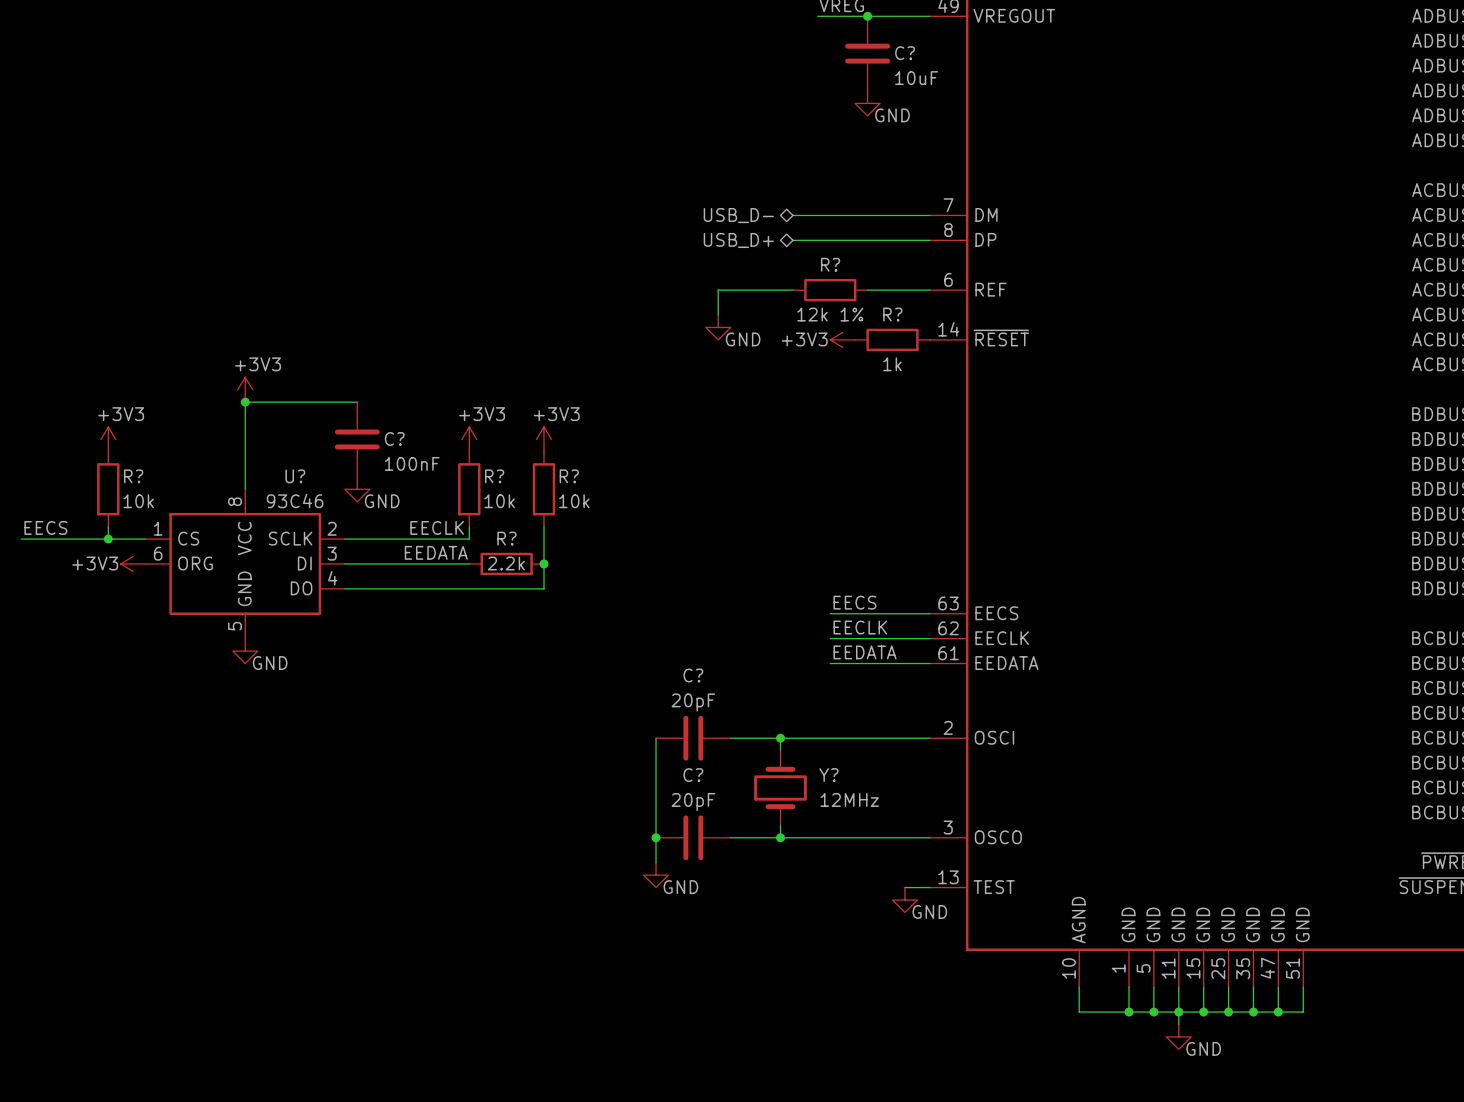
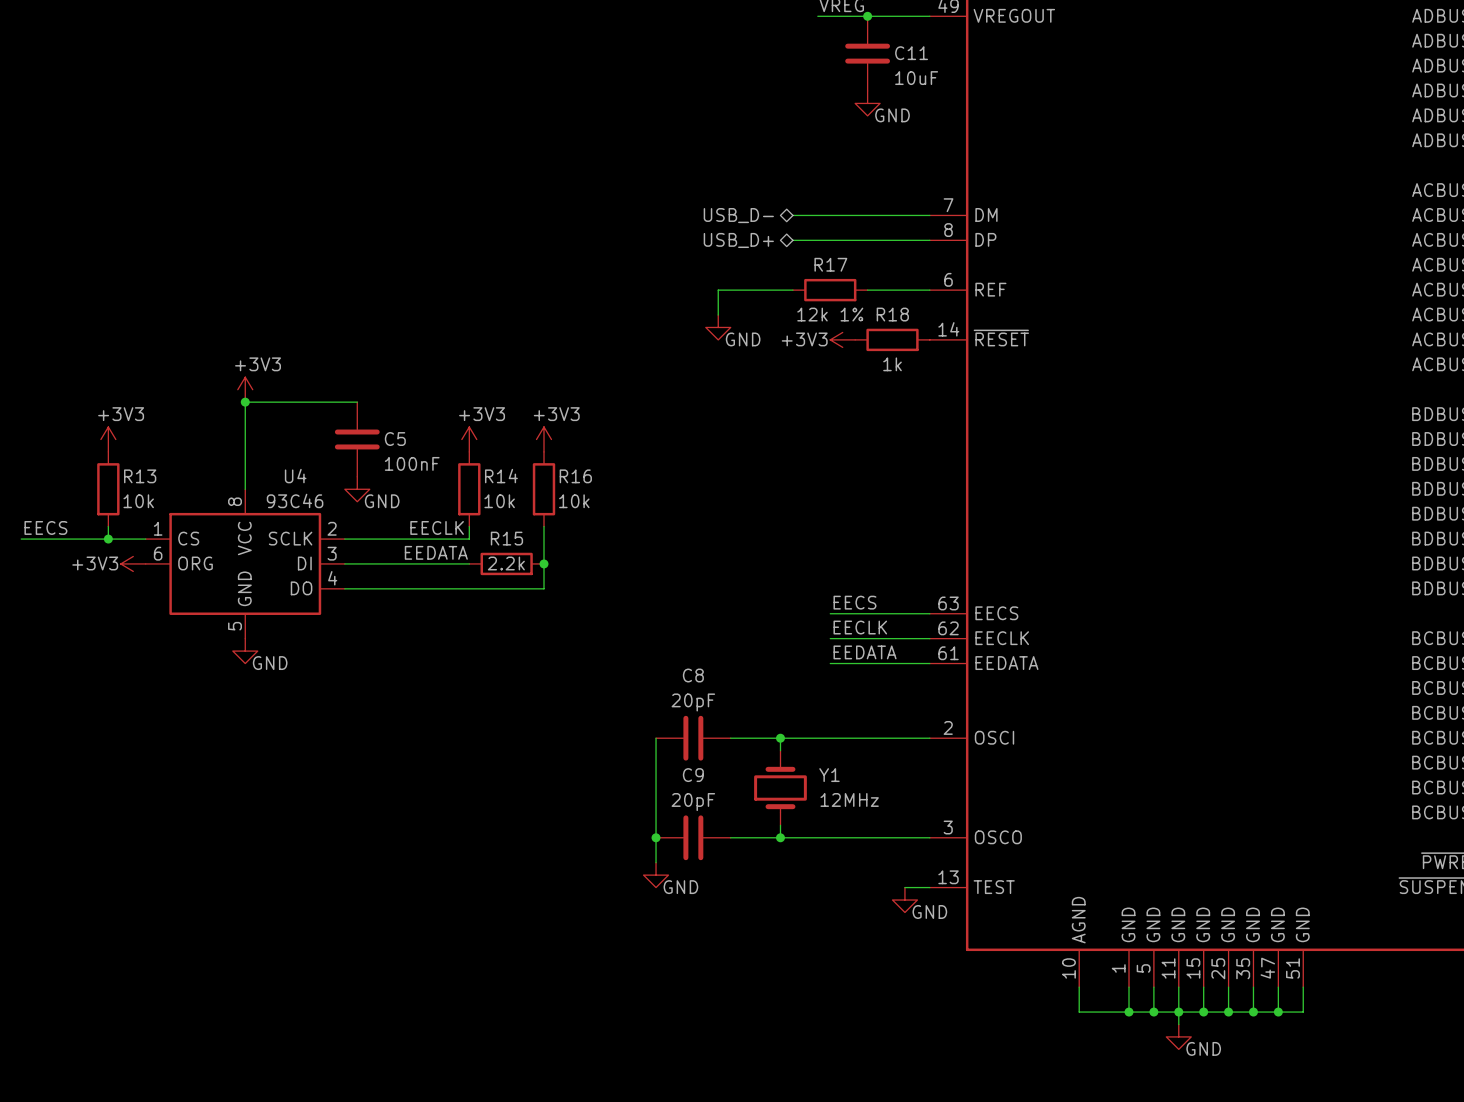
C? name: C? (905, 53) -> C11 (911, 53)
R? name: R? (830, 264) -> R17 (830, 264)
R? name: R? (892, 314) -> R18 (892, 314)
C? name: C? (394, 439) -> C5 (395, 439)
R? name: R? (133, 476) -> R13 (140, 476)
U? name: U? (295, 476) -> U4 (295, 476)
R? name: R? (494, 476) -> R14 (501, 476)
R? name: R? (569, 476) -> R16 (575, 476)
R? name: R? (506, 538) -> R15 (506, 538)
C? name: C? (693, 675) -> C8 (693, 675)
C? name: C? (693, 775) -> C9 (693, 775)
Y? name: Y? (828, 775) -> Y1 (829, 775)

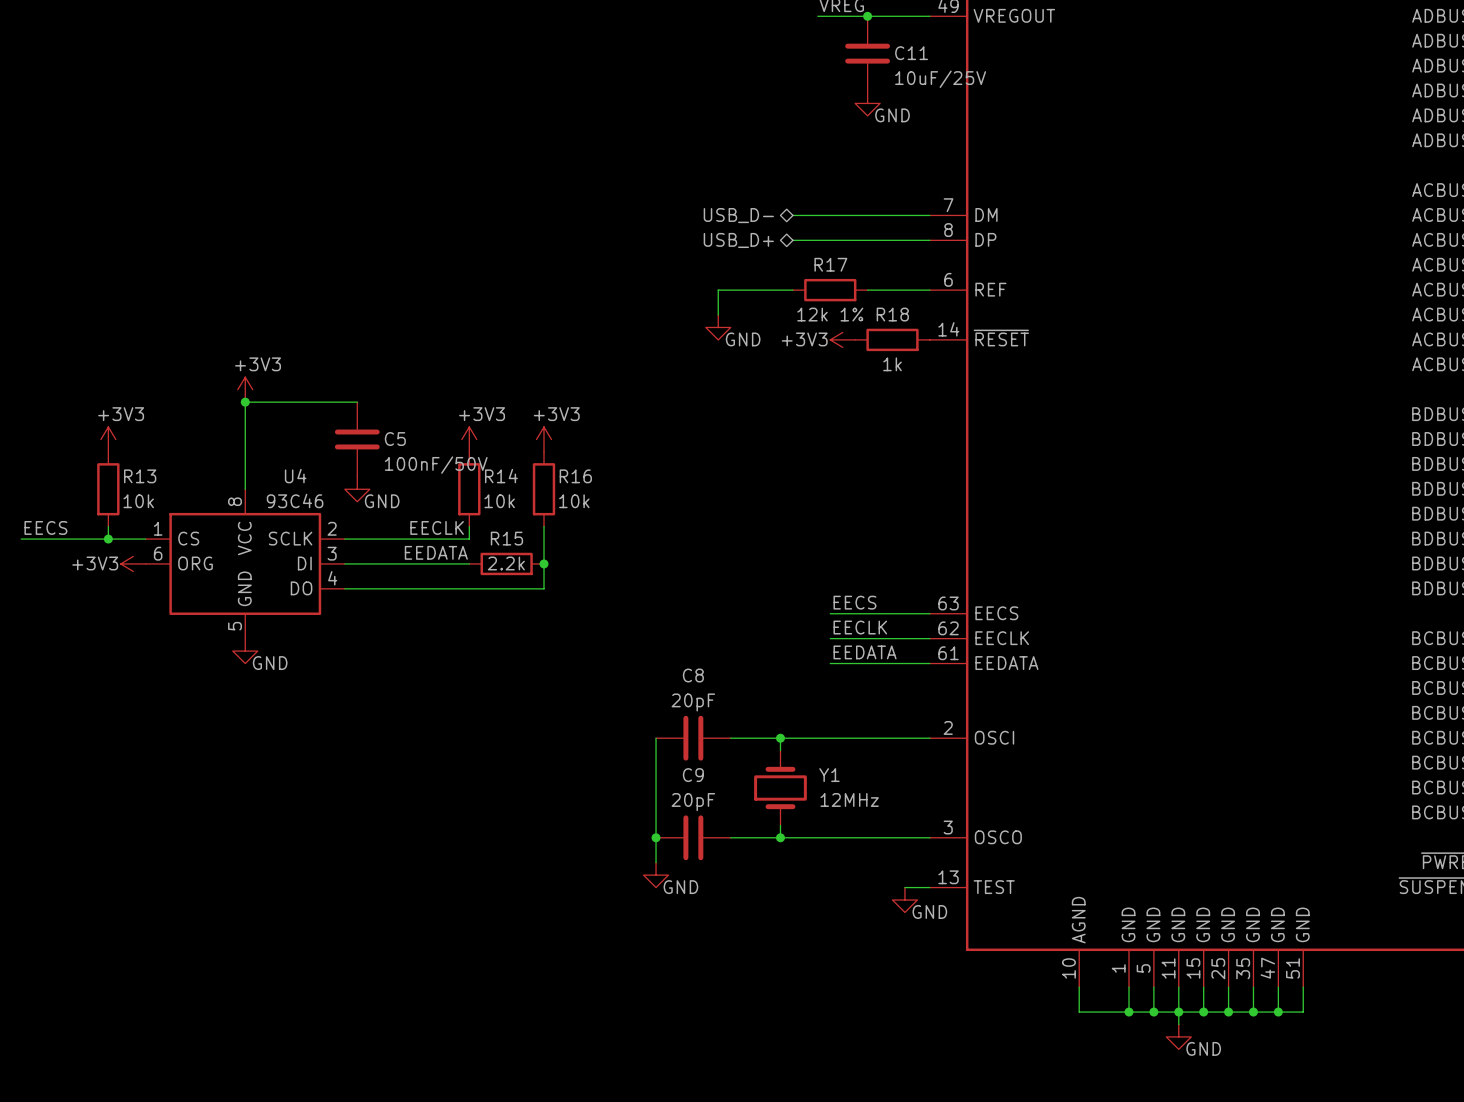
C11 value: 10uF (916, 78) -> 10uF/25V (940, 79)
C5 value: 100nF (412, 463) -> 100nF/50V (436, 465)

